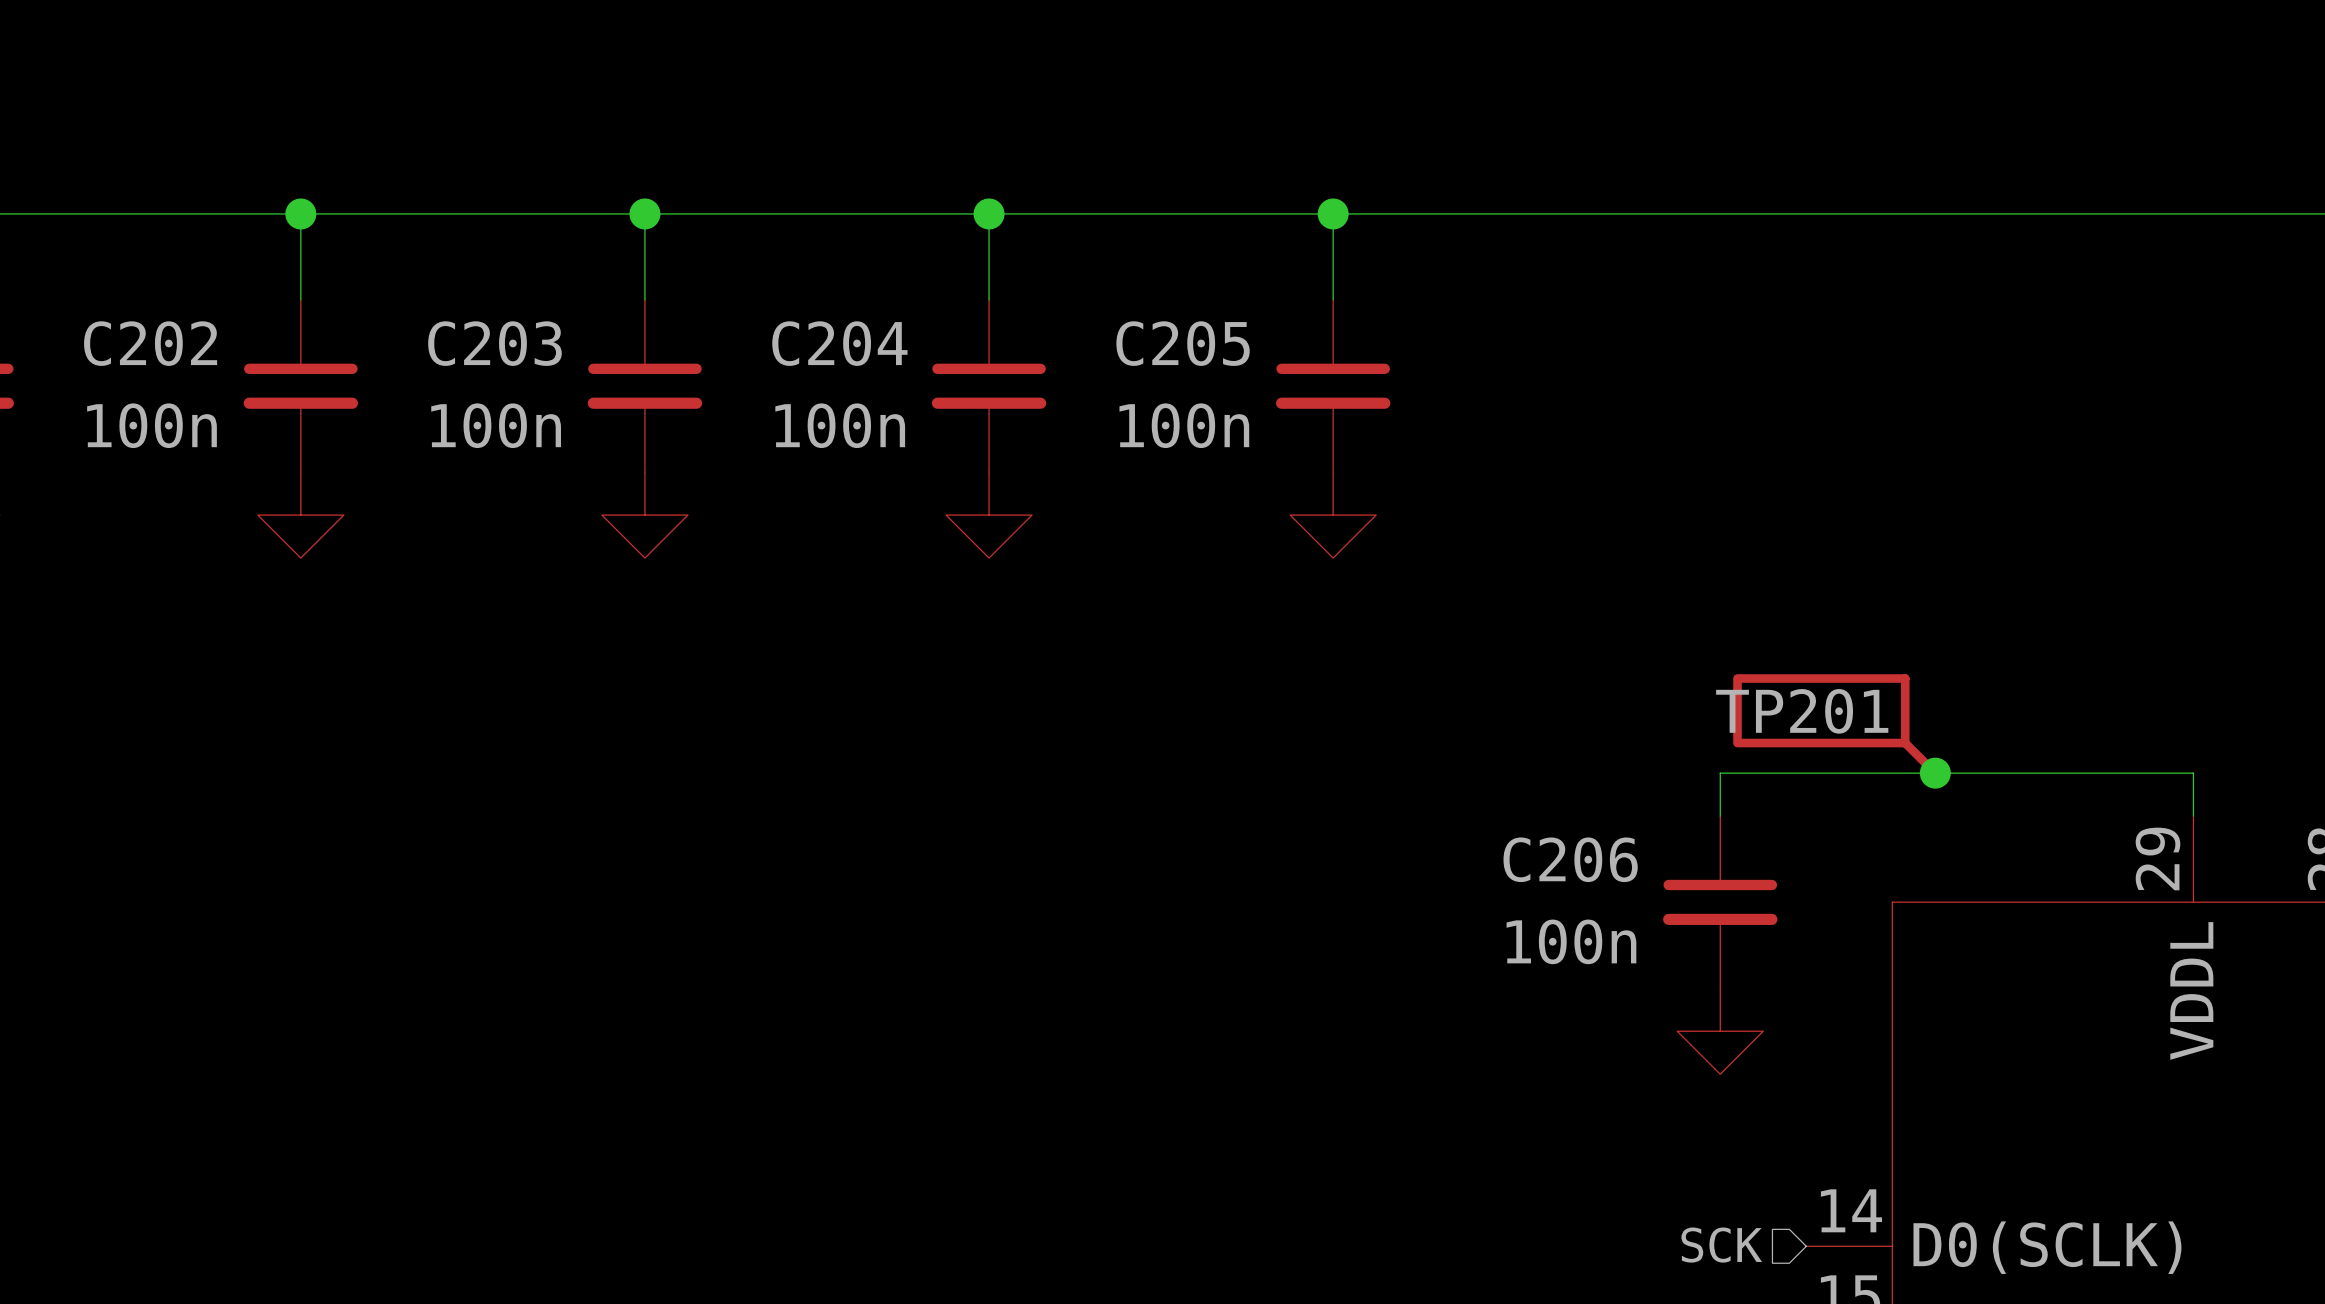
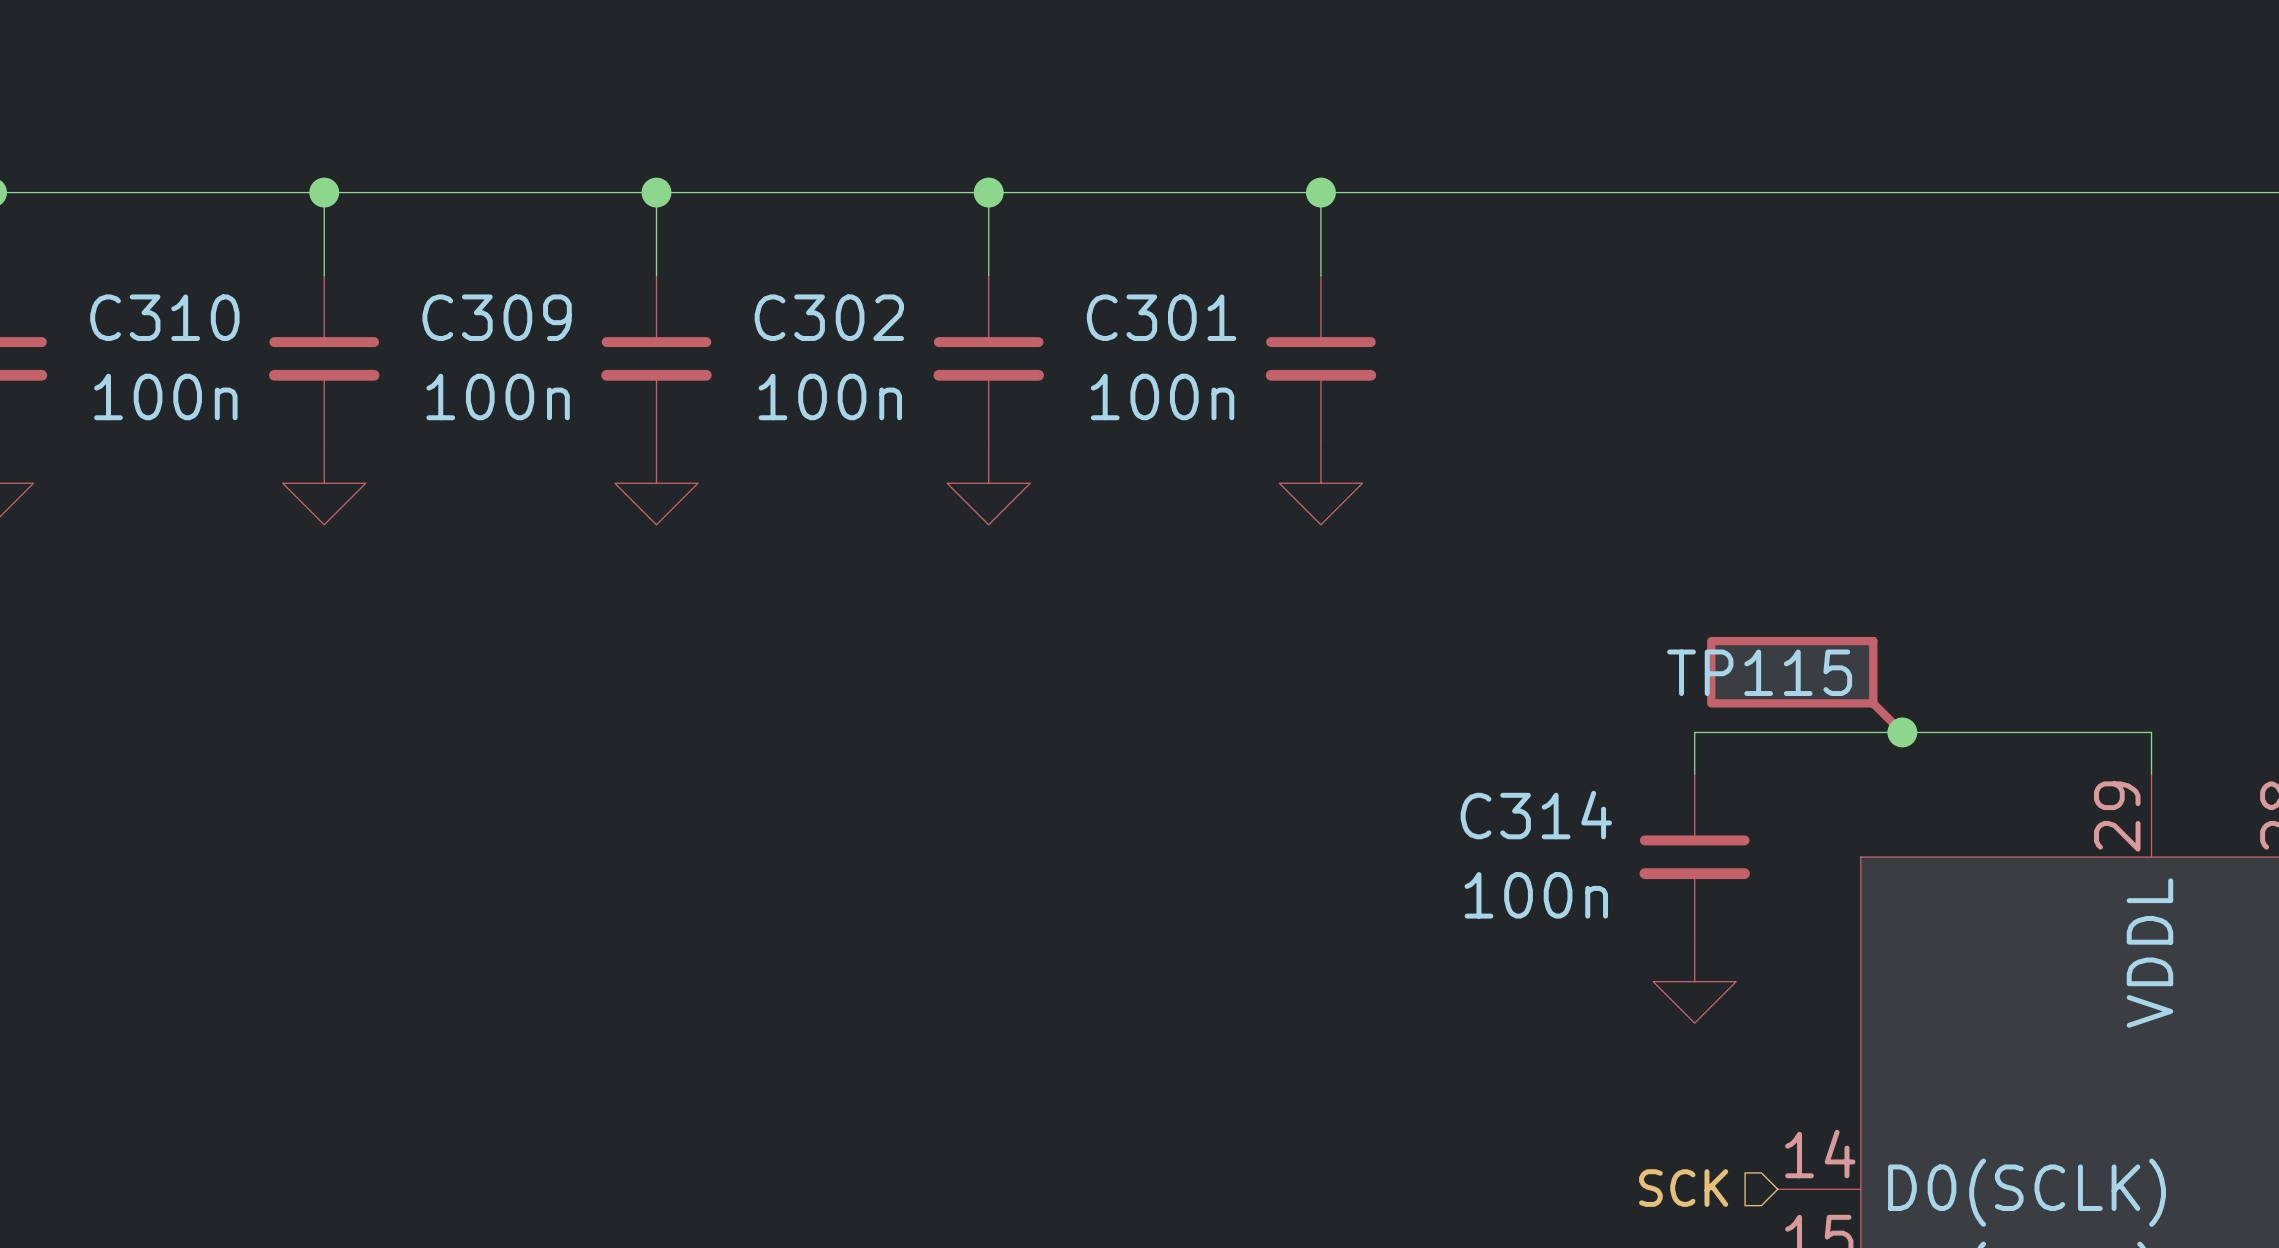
C202 name: C202 (150, 343) -> C310 (164, 317)
C203 name: C203 (494, 343) -> C309 (497, 317)
C204 name: C204 (839, 343) -> C302 (829, 317)
C205 name: C205 (1183, 343) -> C301 (1161, 317)
TP201 name: TP201 (1802, 711) -> TP115 (1759, 672)
C206 name: C206 (1570, 859) -> C314 (1536, 815)

